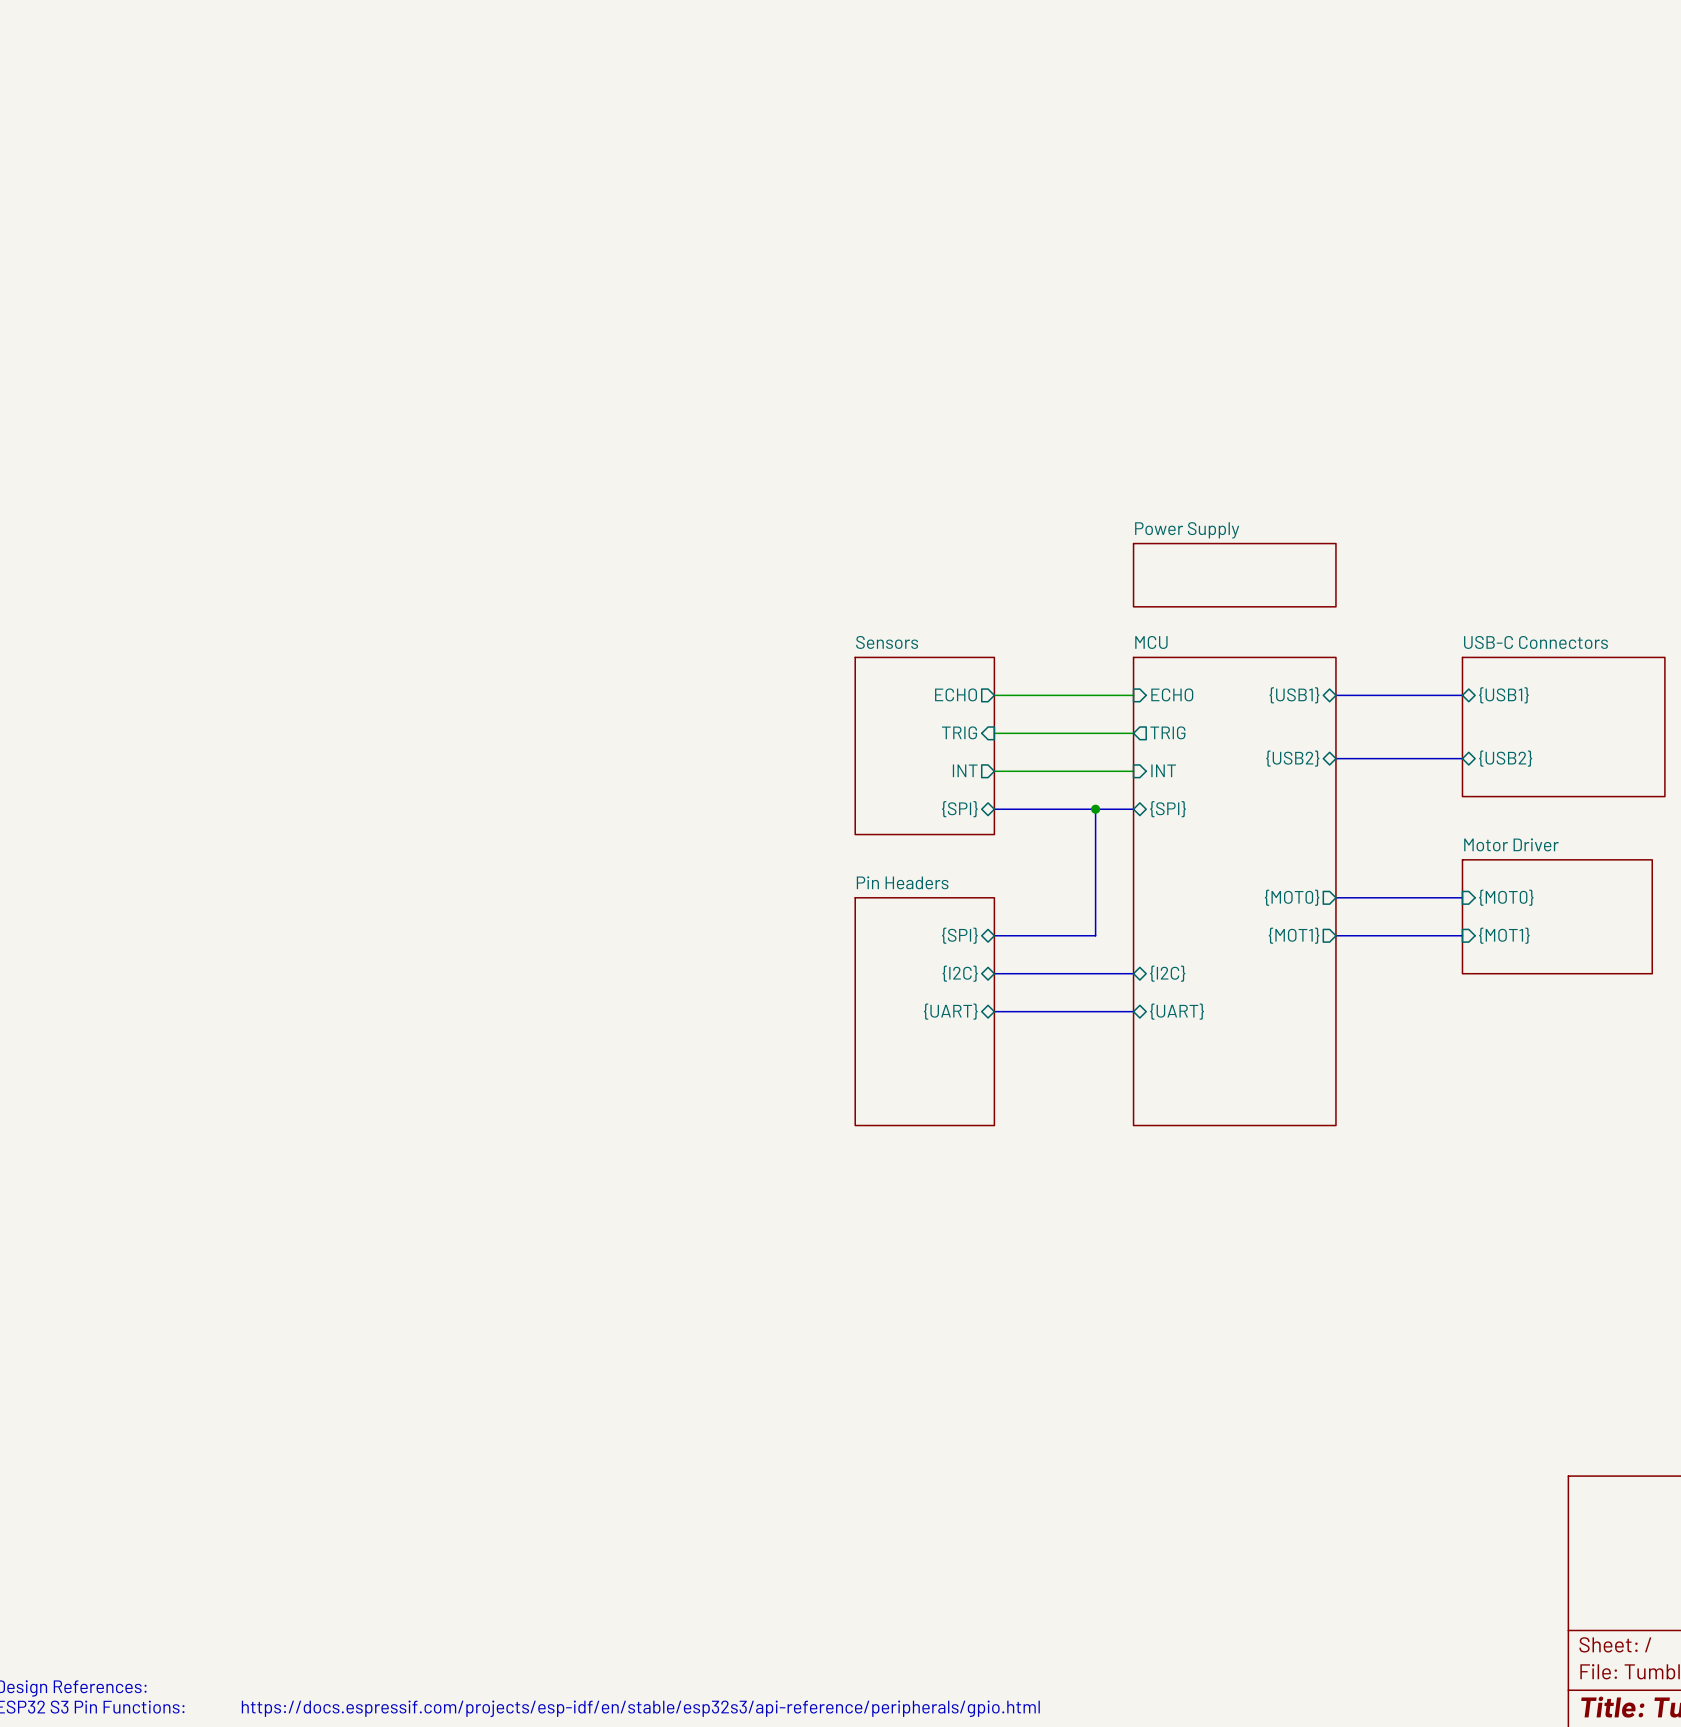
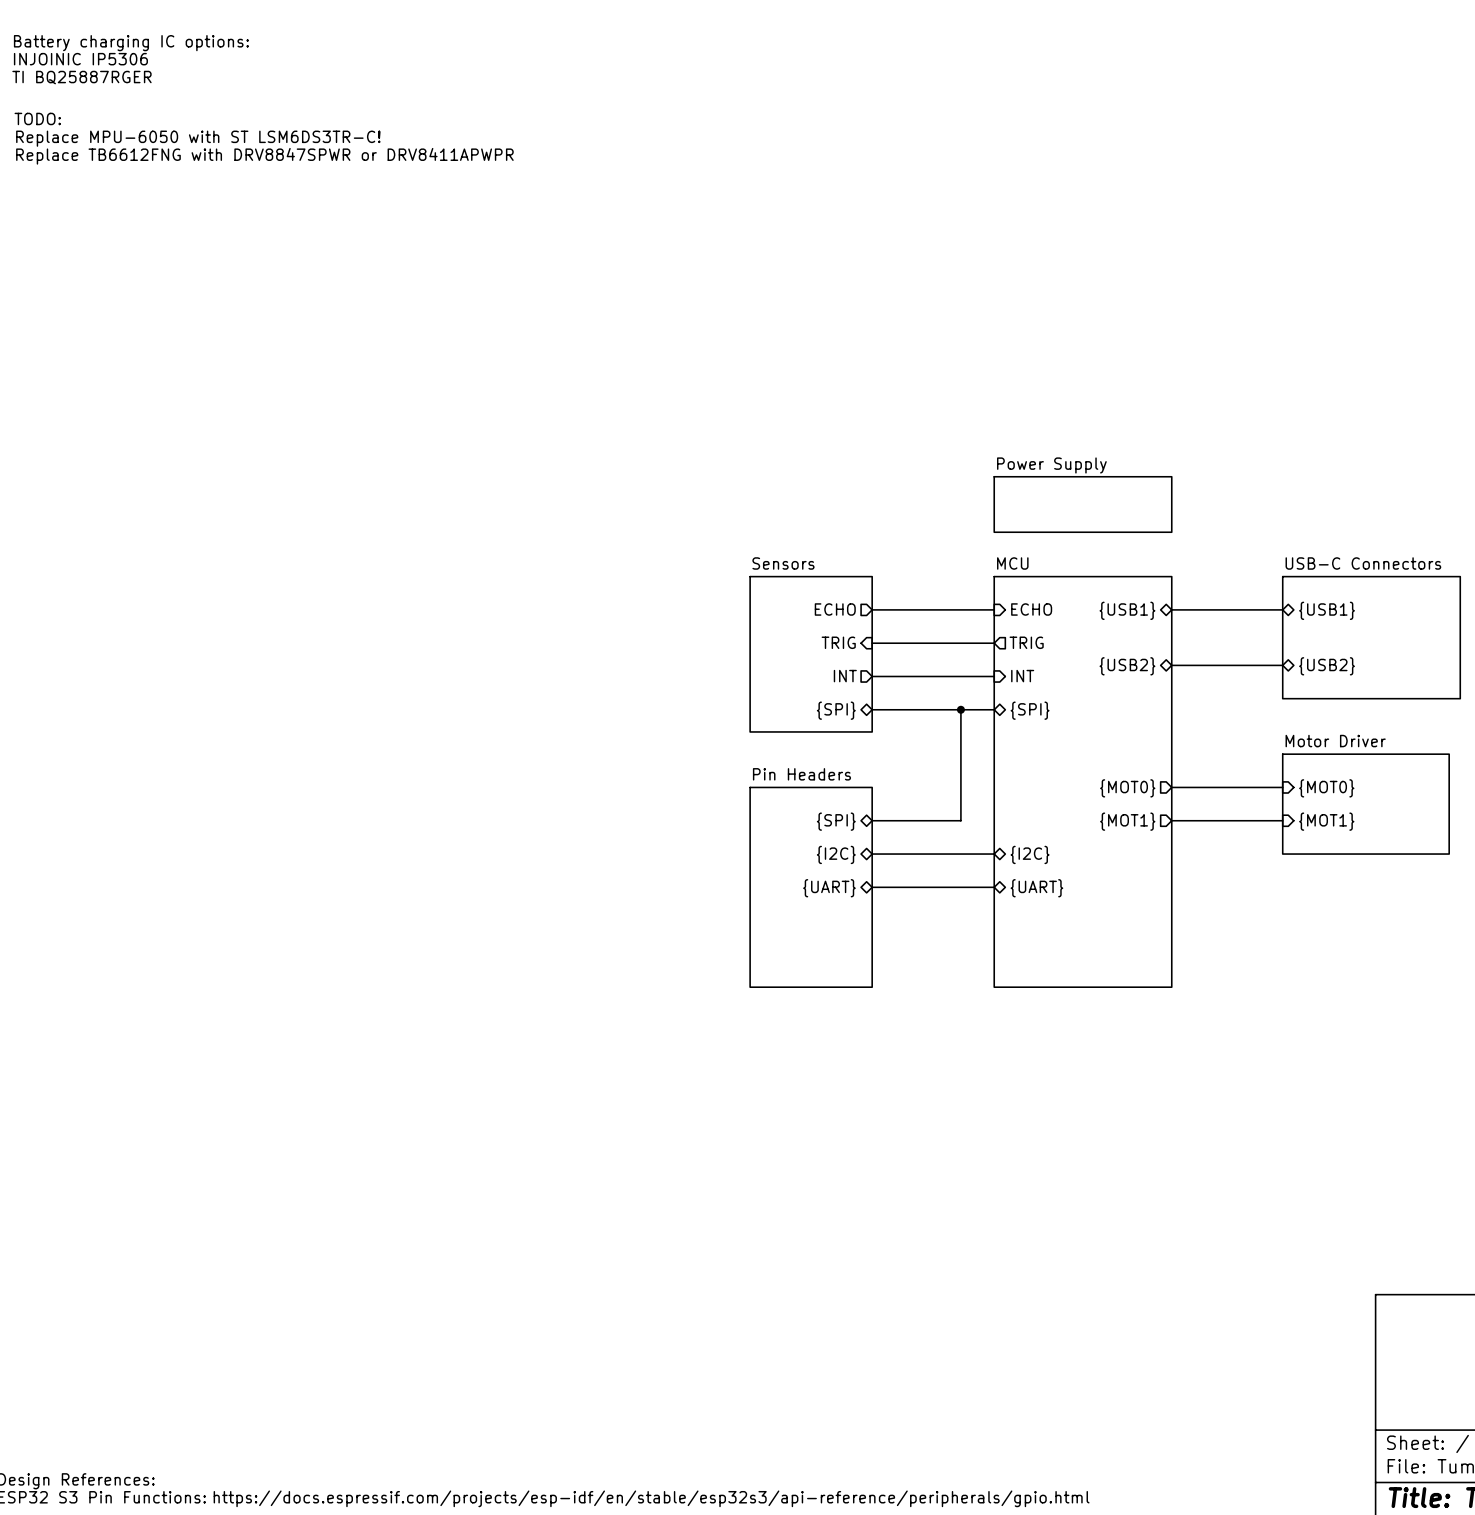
text: none -> Battery charging IC options: (131, 43)
text: none -> INJOINIC IP5306 (80, 59)
text: none -> TI BQ25887RGER (81, 77)
text: none -> TODO: (37, 118)
text: none -> Replace MPU-6050 with ST LSM6DS3TR-C! (198, 138)
text: none -> Replace TB6612FNG with DRV8847SPWR or DRV8411APWPR (264, 156)

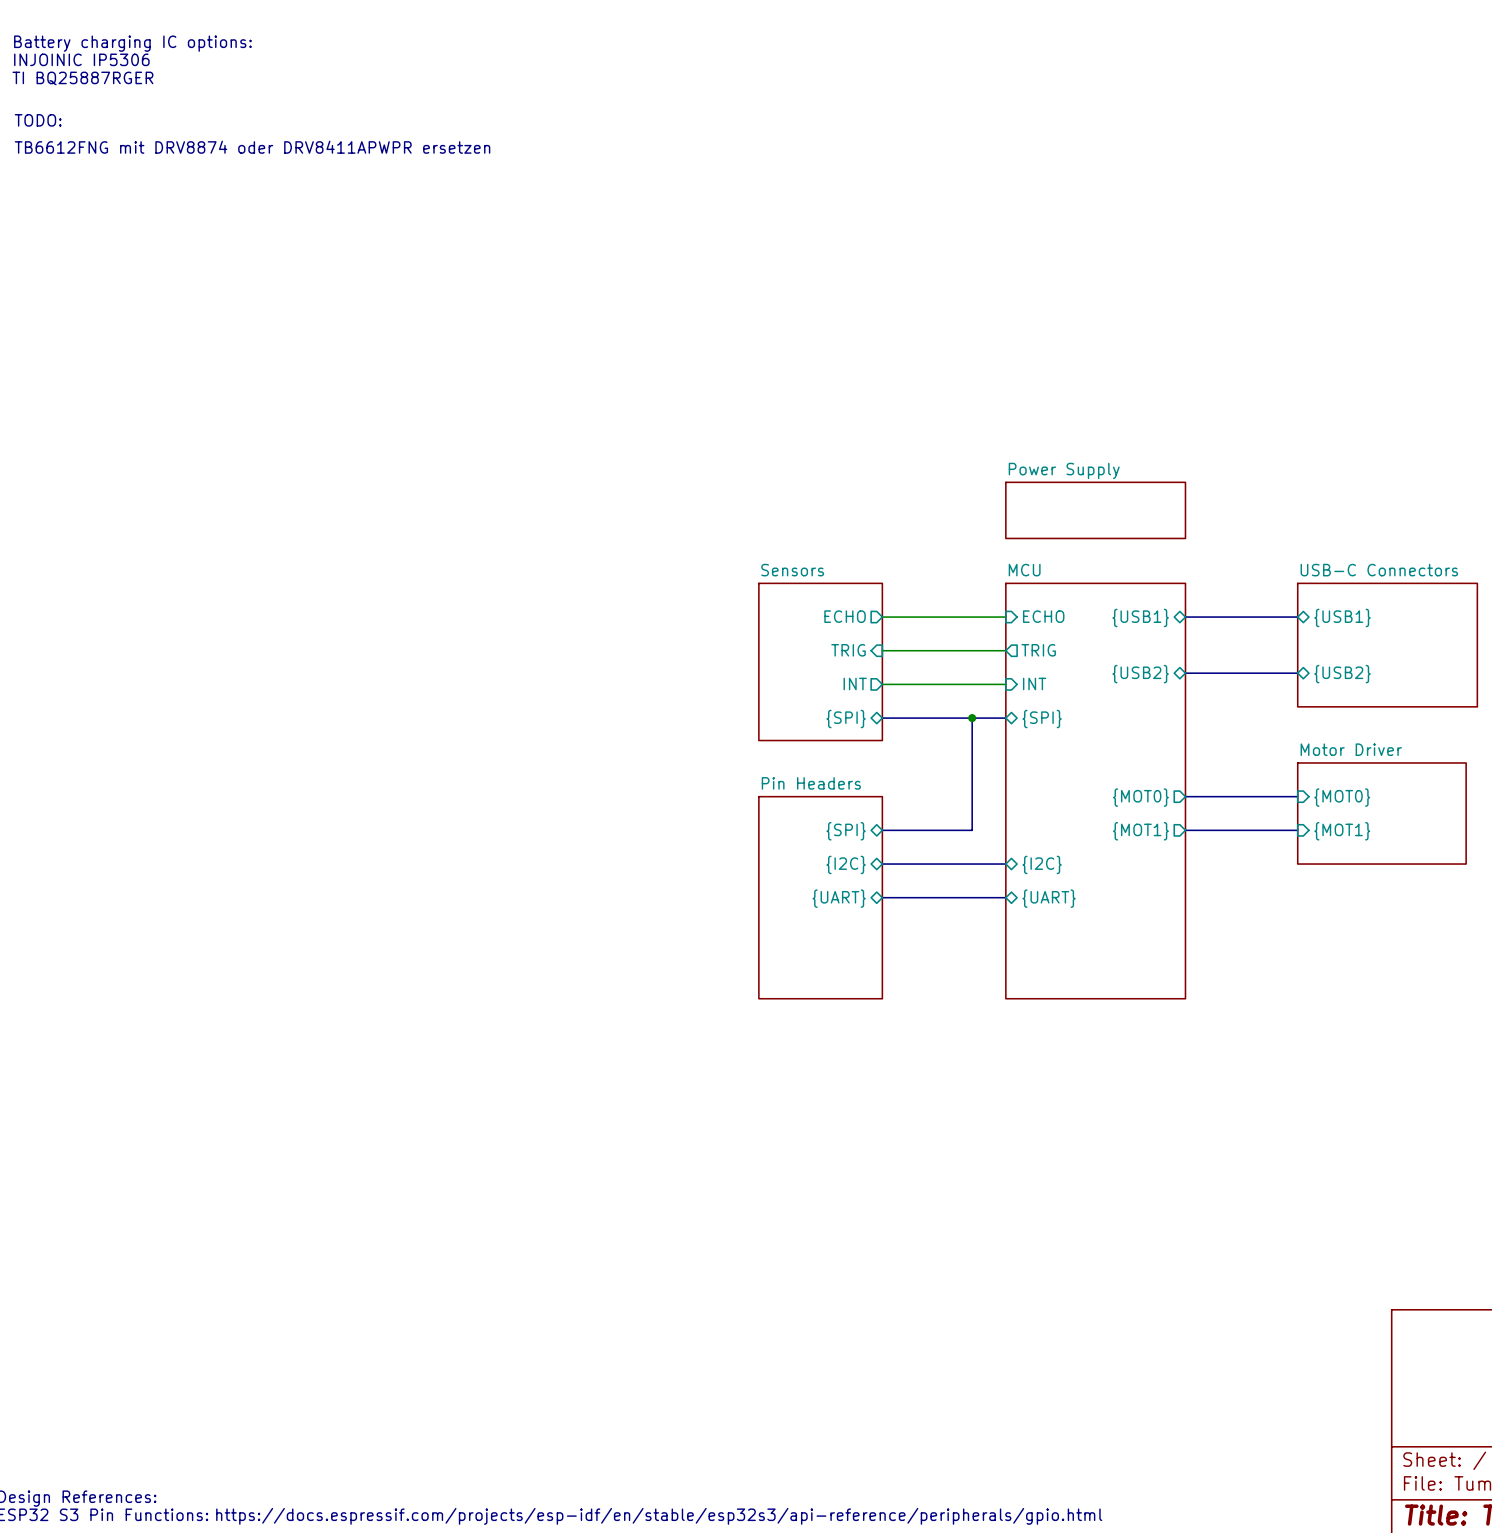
text: Replace MPU-6050 with ST LSM6DS3TR-C! (198, 138) -> none
text: Replace TB6612FNG with DRV8847SPWR or DRV8411APWPR (264, 156) -> TB6612FNG mit DRV8874 oder DRV8411APWPR ersetzen (252, 147)

